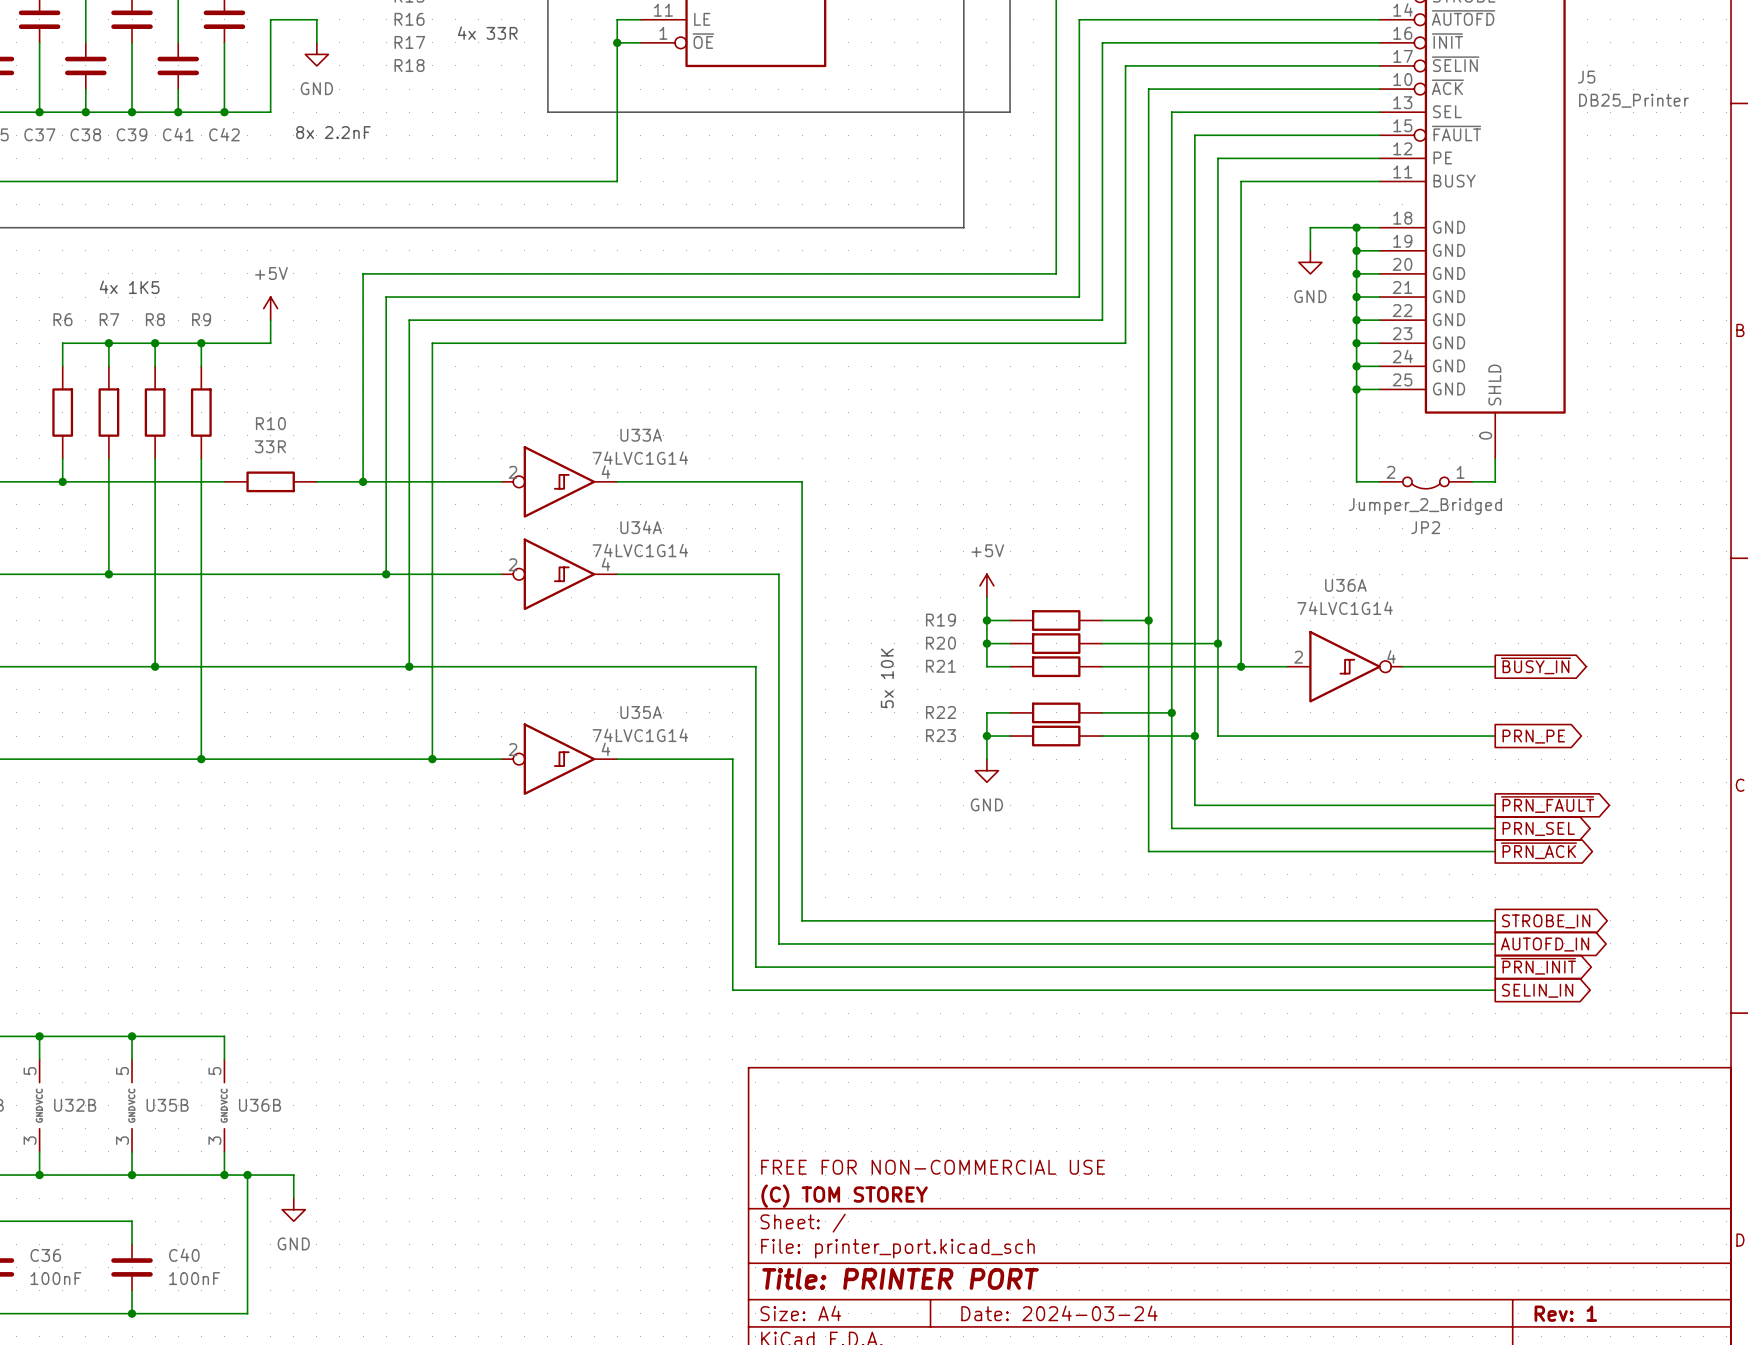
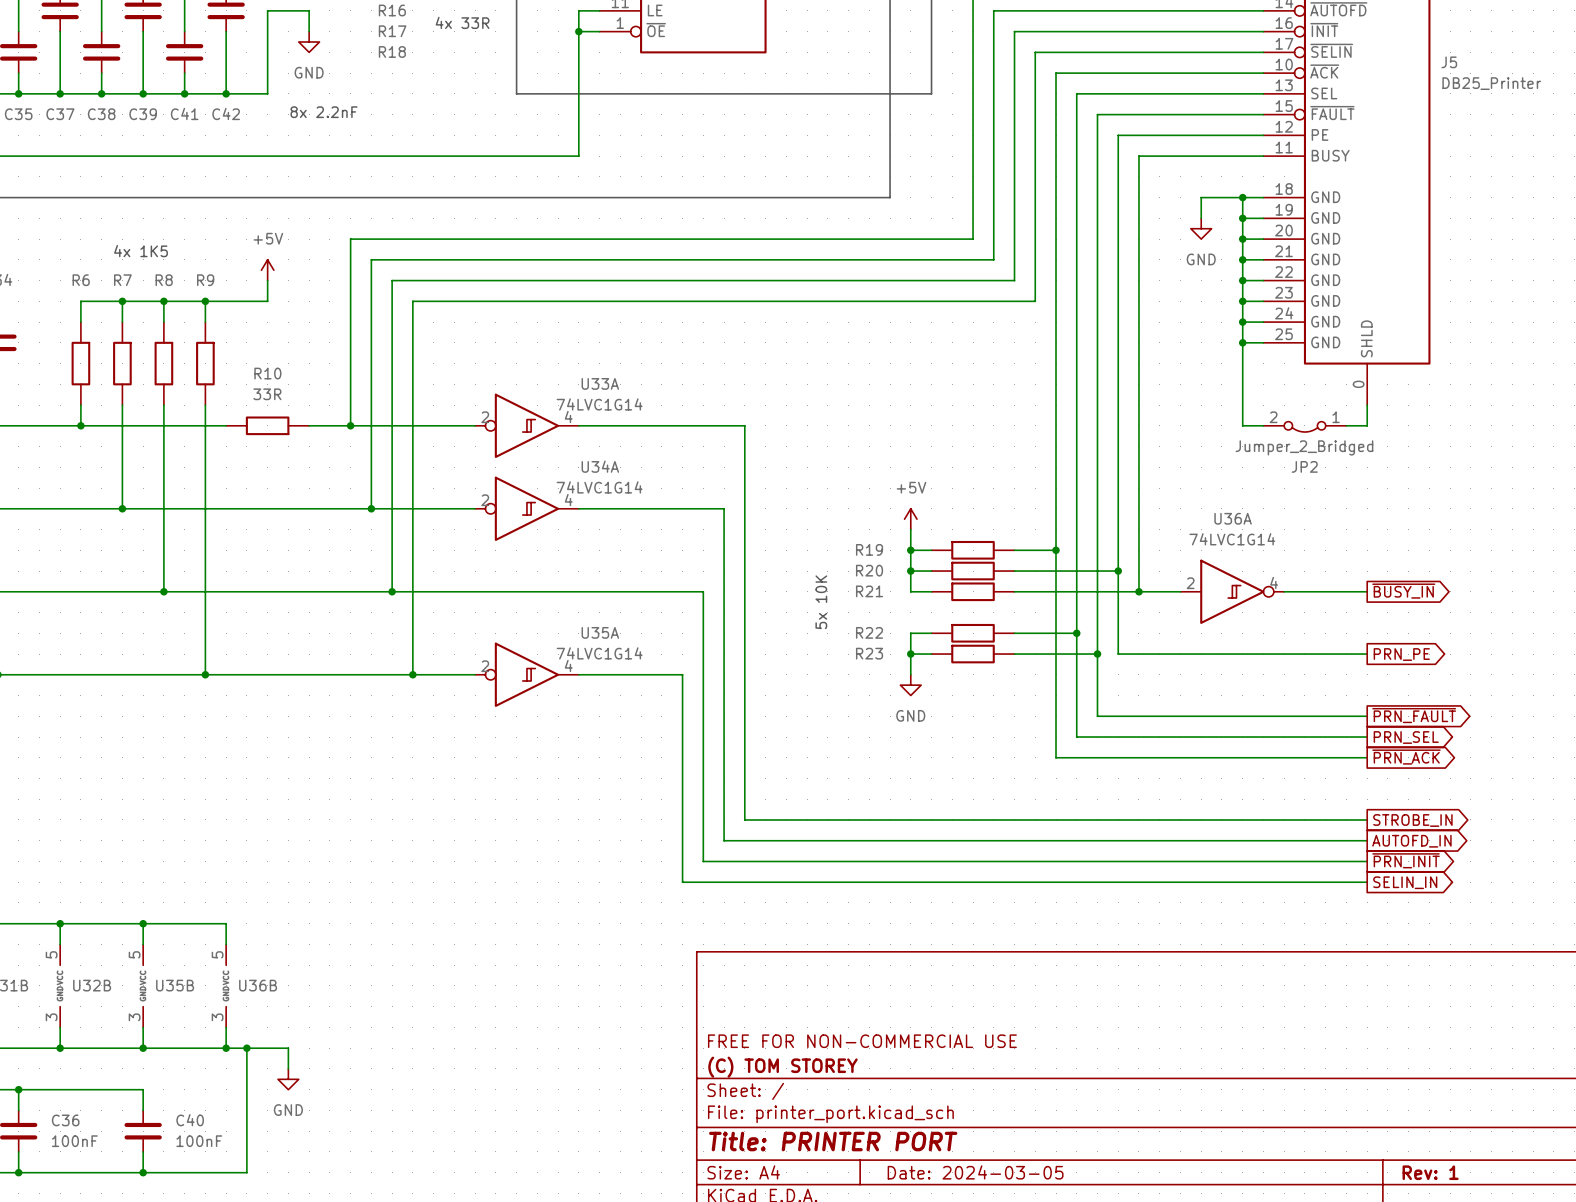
title block: Date: 2024-03-24 (1059, 1313) -> Date: 2024-03-05 (975, 1172)

